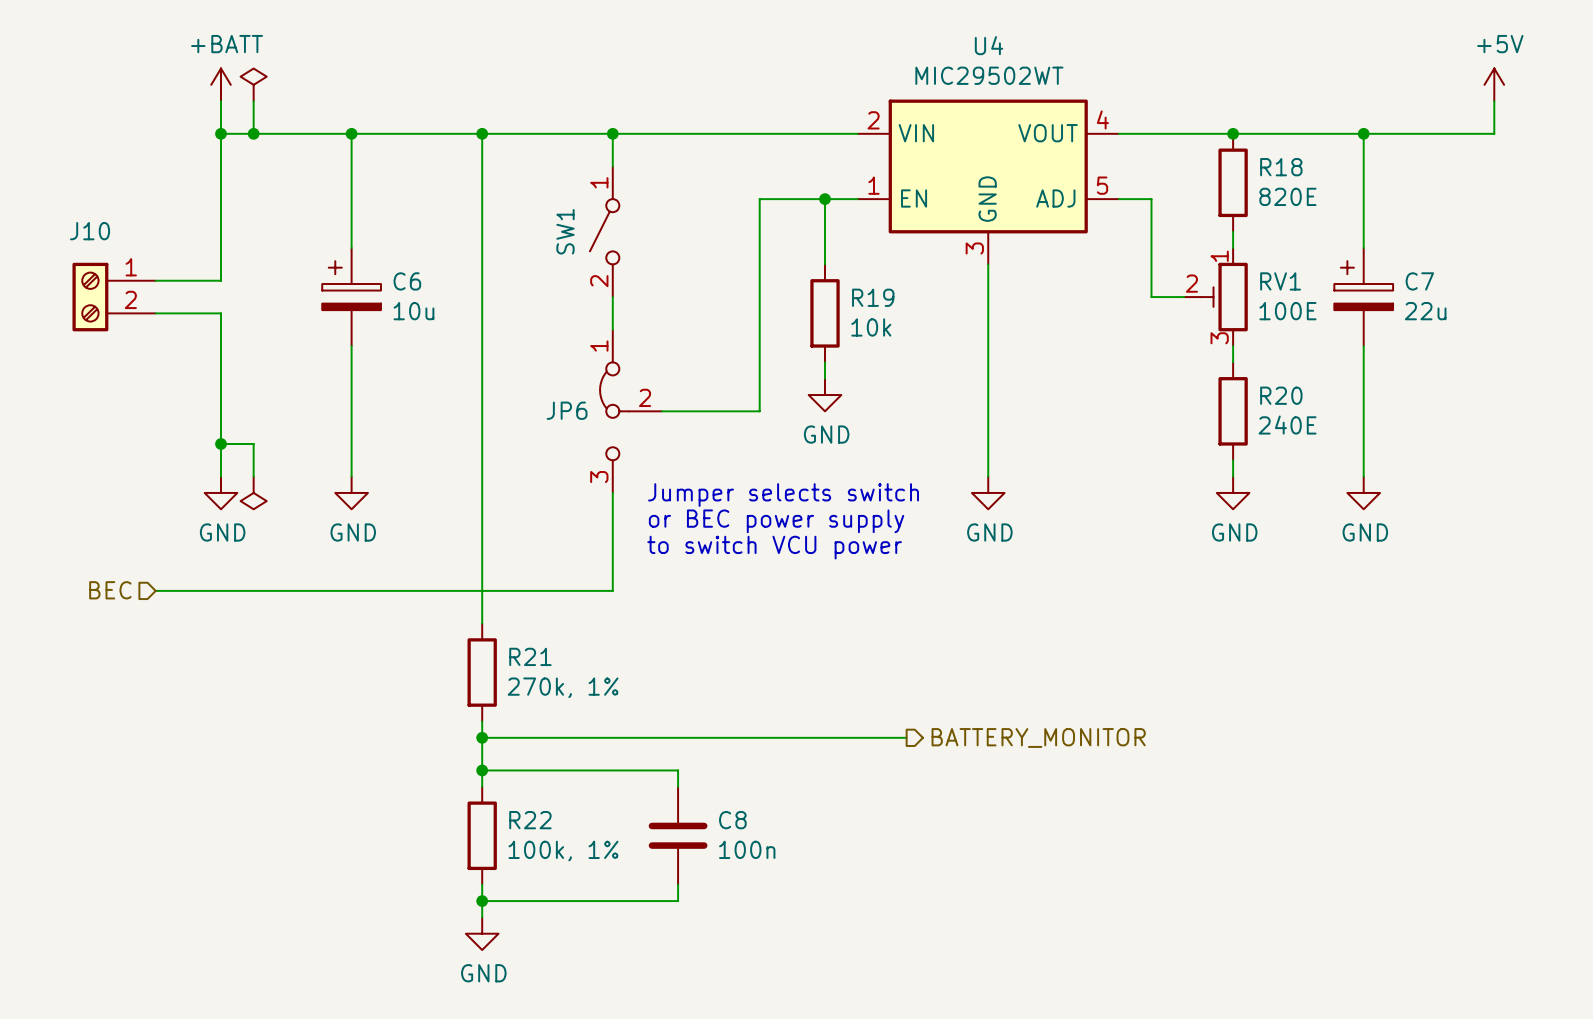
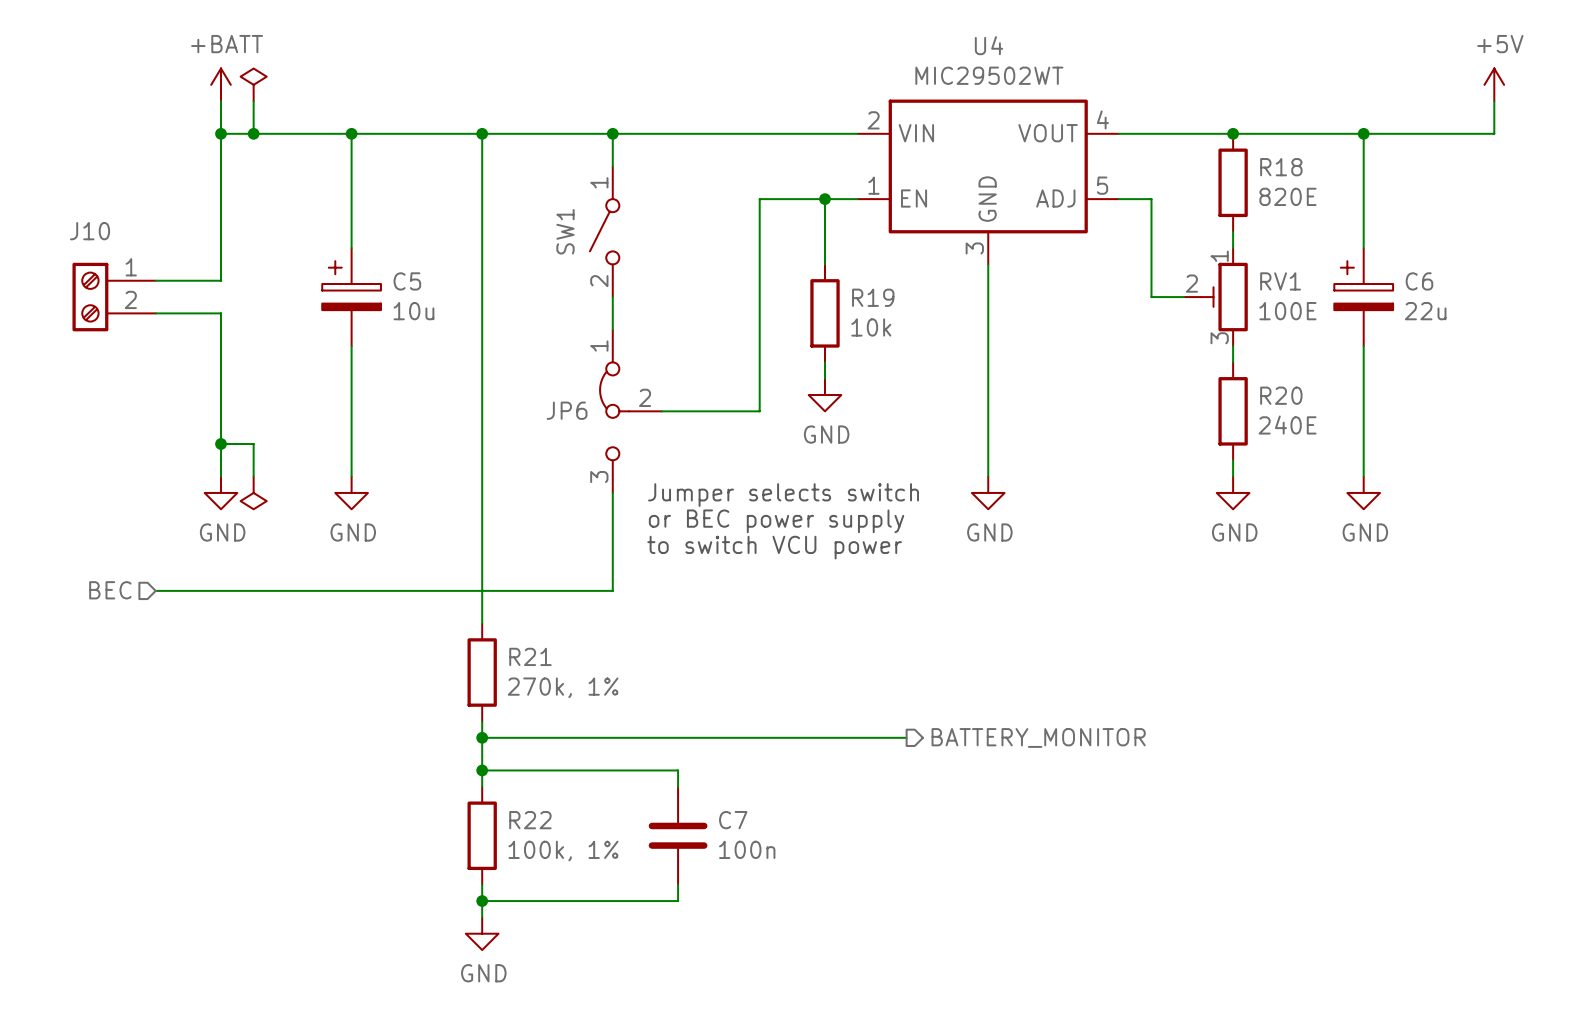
C6 name: C6 (407, 281) -> C5 (407, 281)
C7 name: C7 (1419, 281) -> C6 (1419, 281)
C8 name: C8 (732, 820) -> C7 (733, 820)

